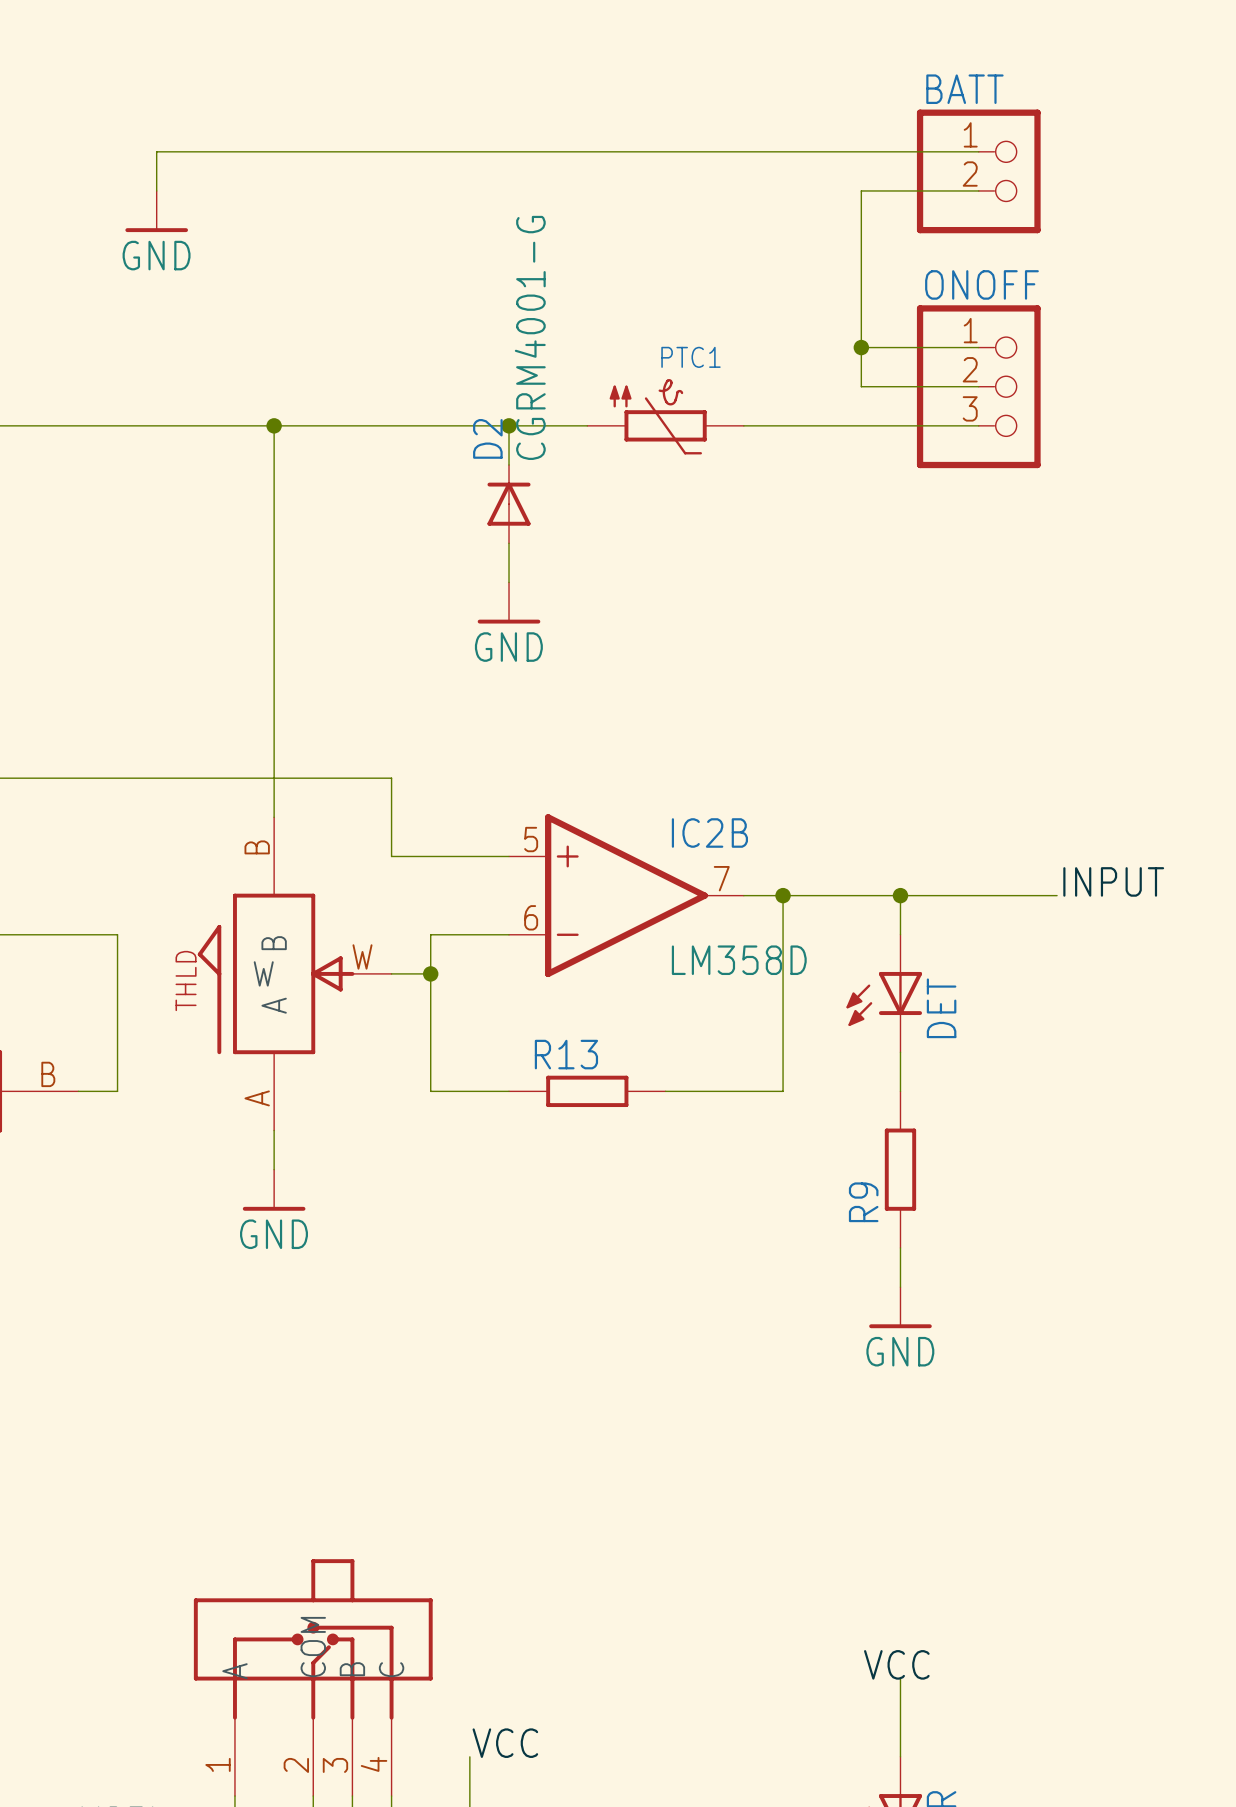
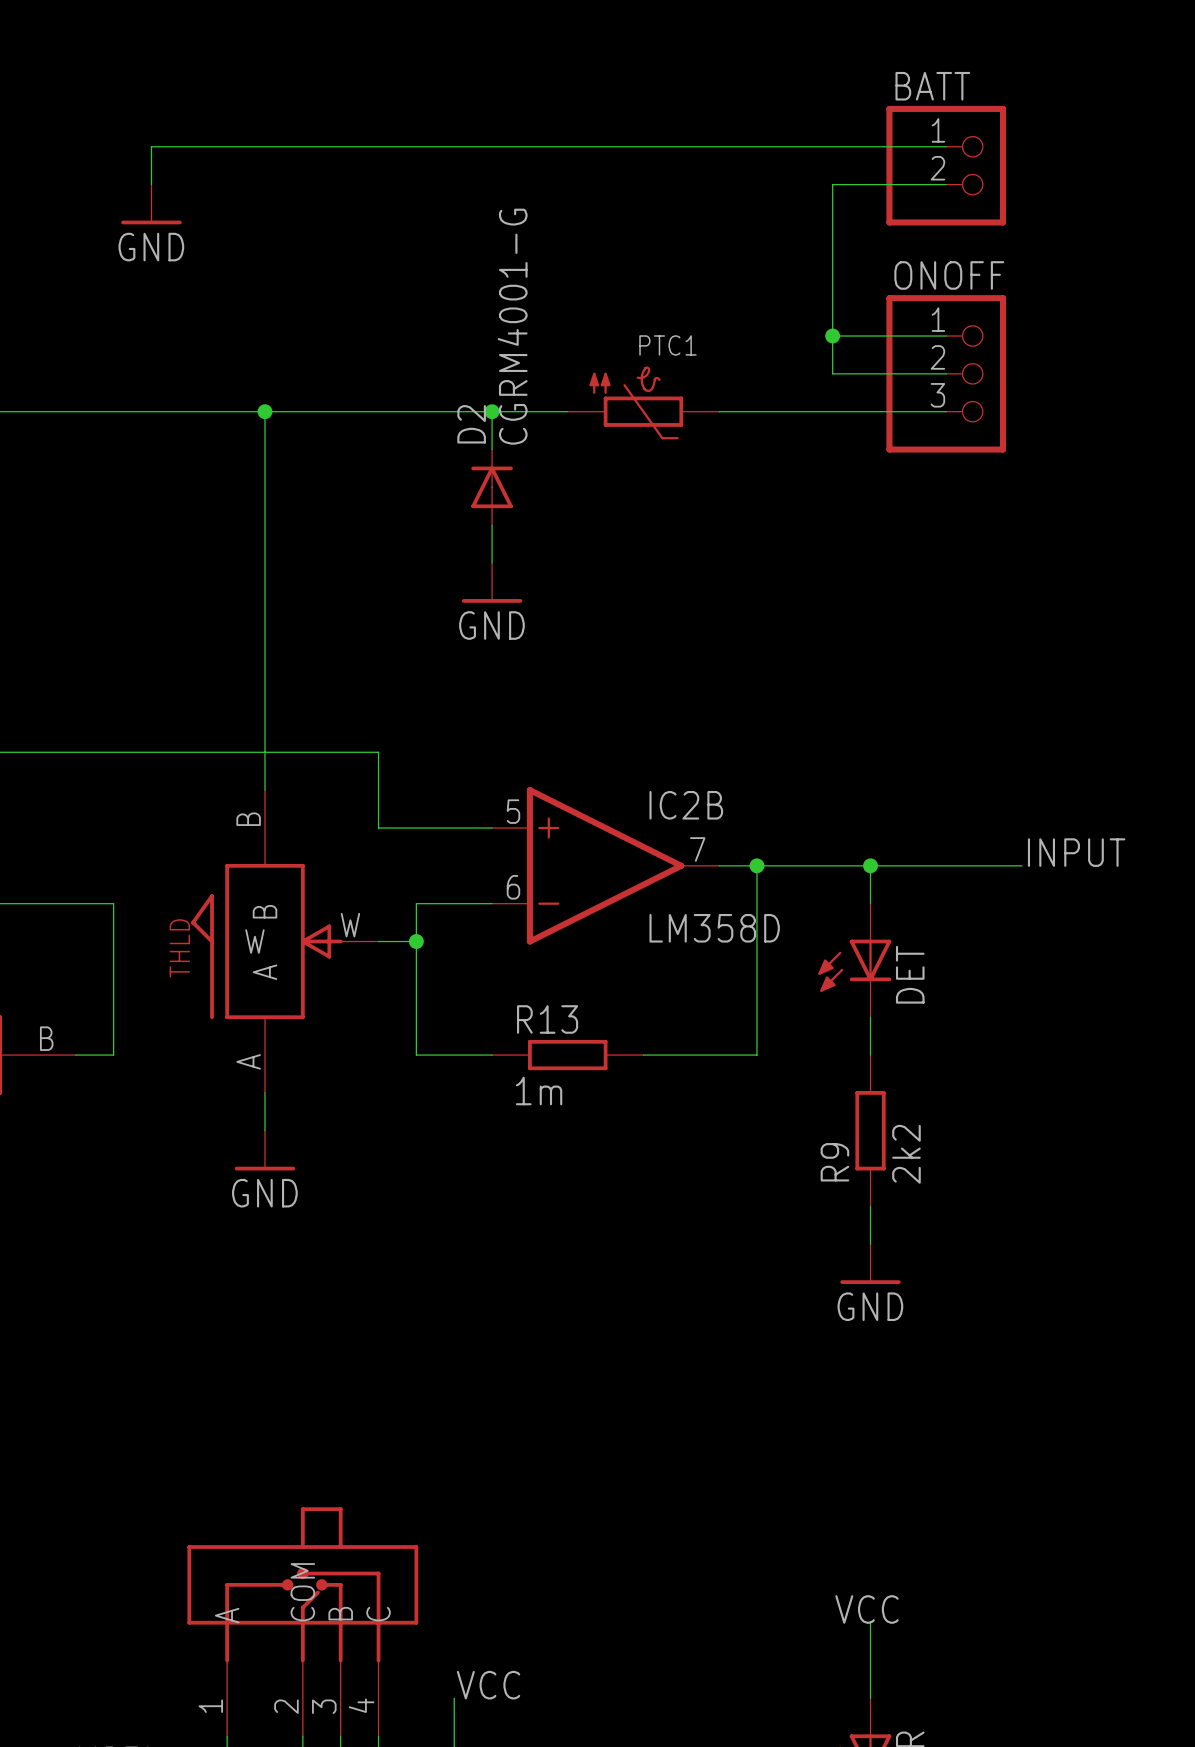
R13 value: none -> 1m (539, 1091)
R9 value: none -> 2k2 (906, 1154)

